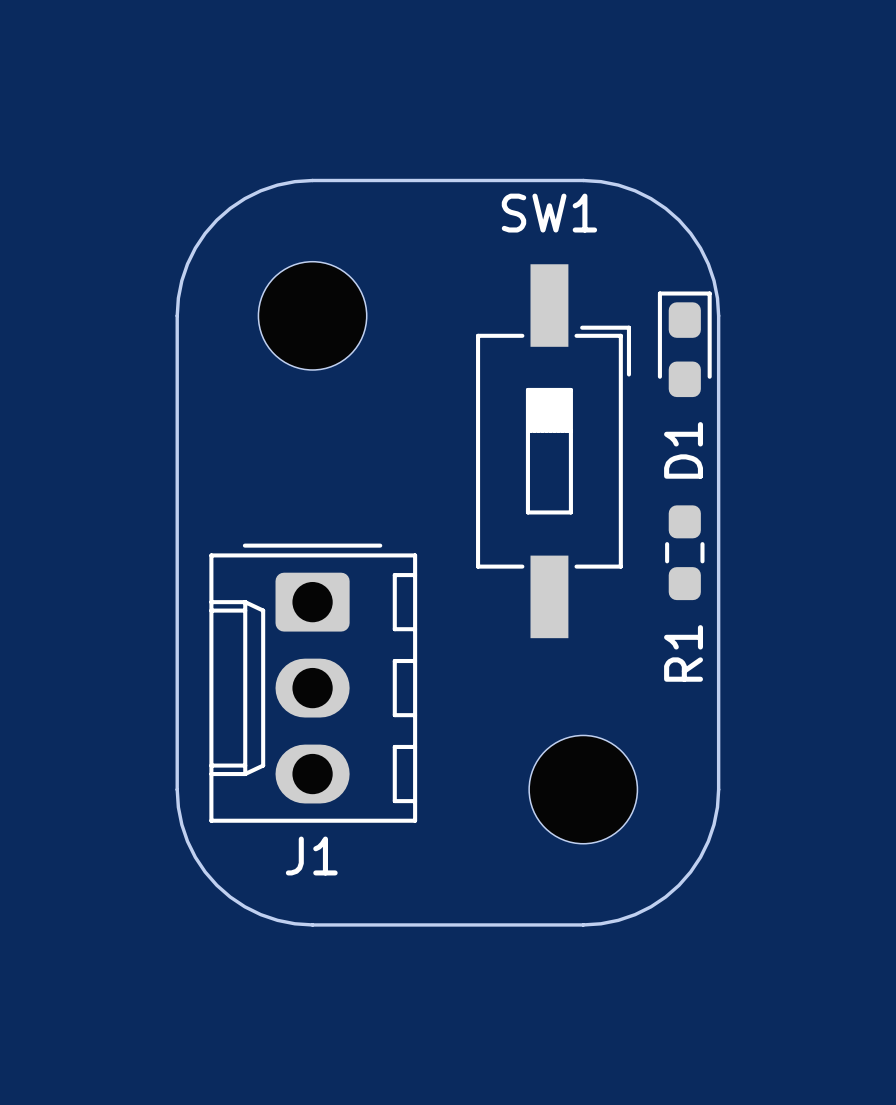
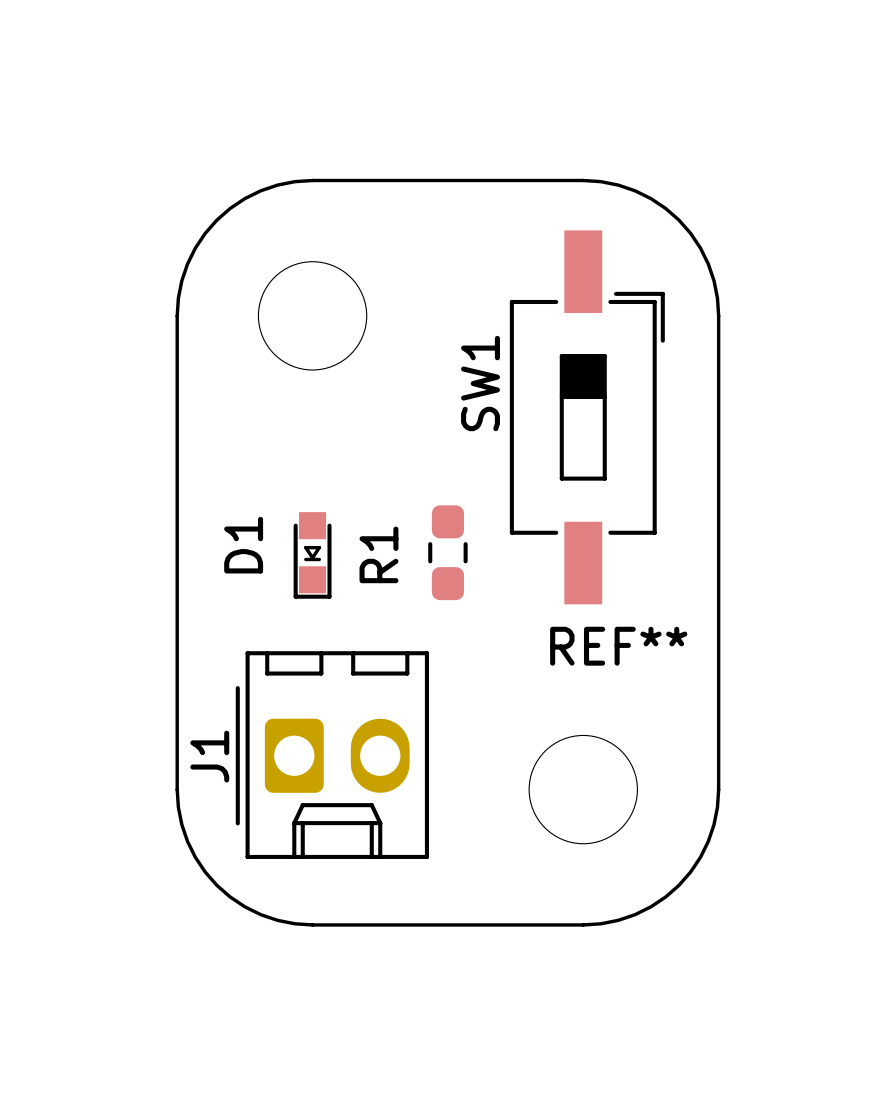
SW1 name rotation: 0° (549, 213) -> 90° counterclockwise (480, 383)
SW1 name position: SW1 (549, 213) -> SW1 (480, 383)
D1 footprint: [657, 291, 712, 398] -> [293, 512, 332, 599]
D1 name position: D1 (683, 450) -> D1 (243, 545)
SW1 position: (553, 451) -> (587, 417)
J1 footprint: [209, 543, 418, 823] -> [235, 651, 429, 859]
R1 position: (684, 552) -> (447, 552)
REF** name: none -> REF** (618, 646)
R1 name position: R1 (683, 653) -> R1 (378, 554)
J1 name position: J1 (311, 856) -> J1 (209, 756)

